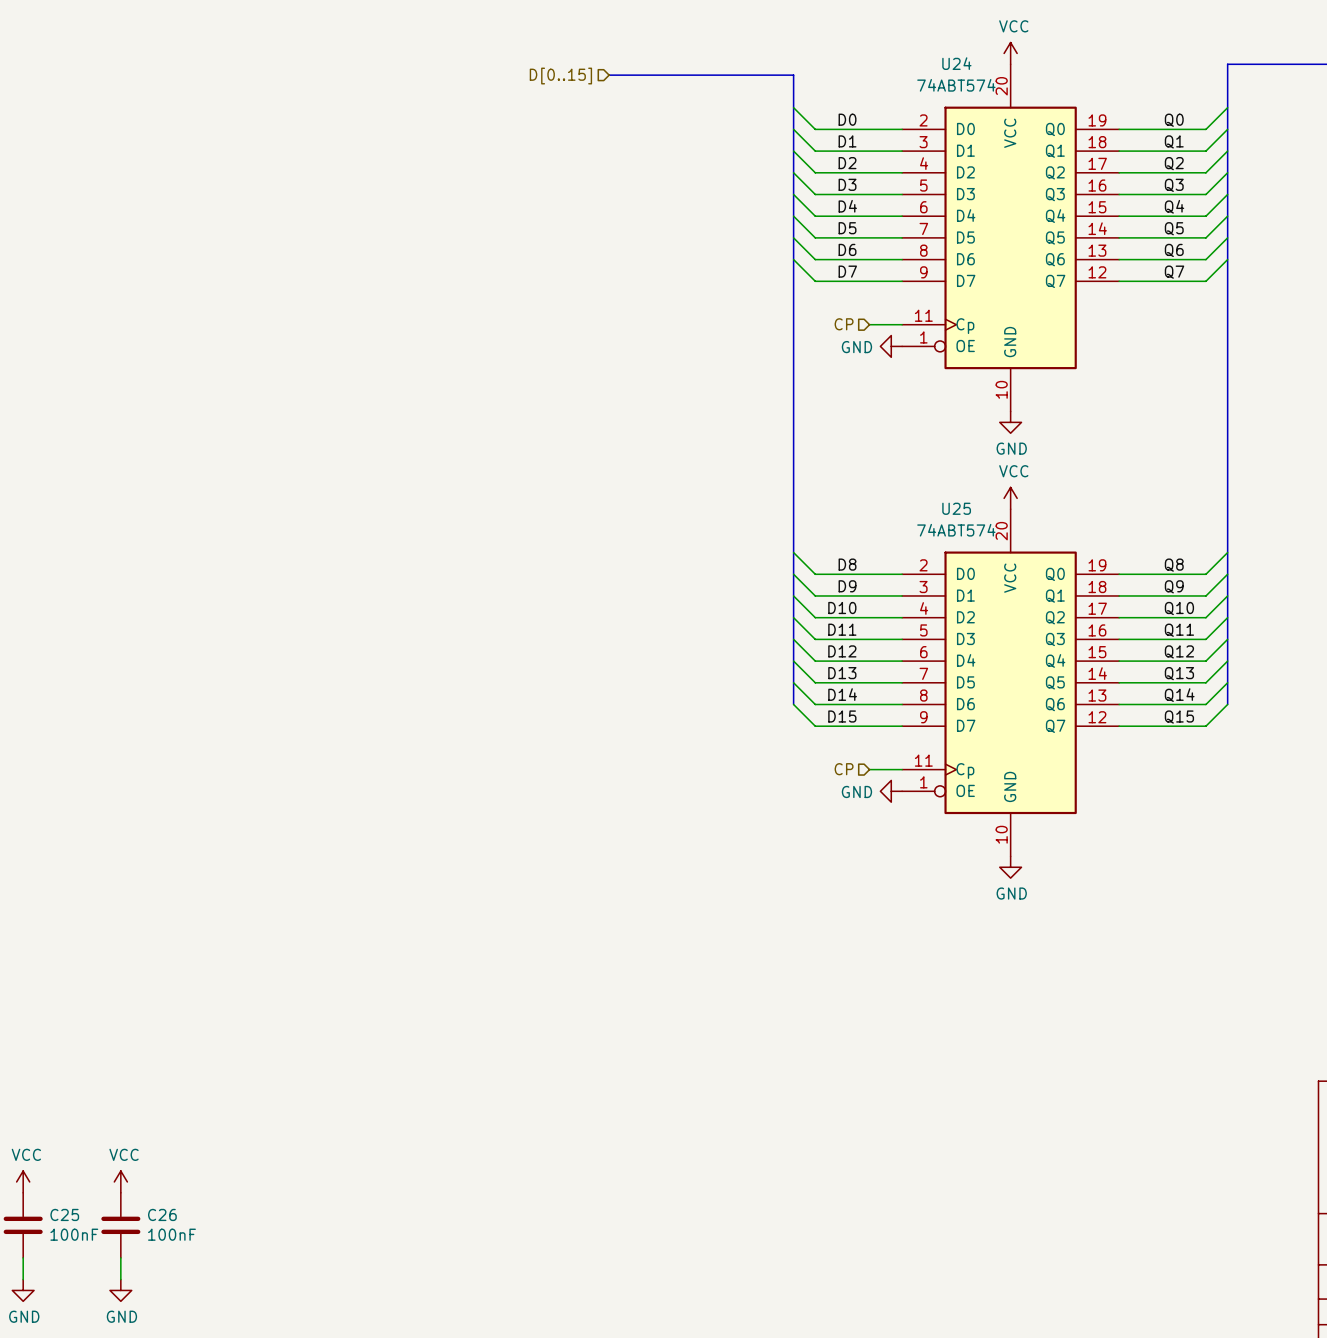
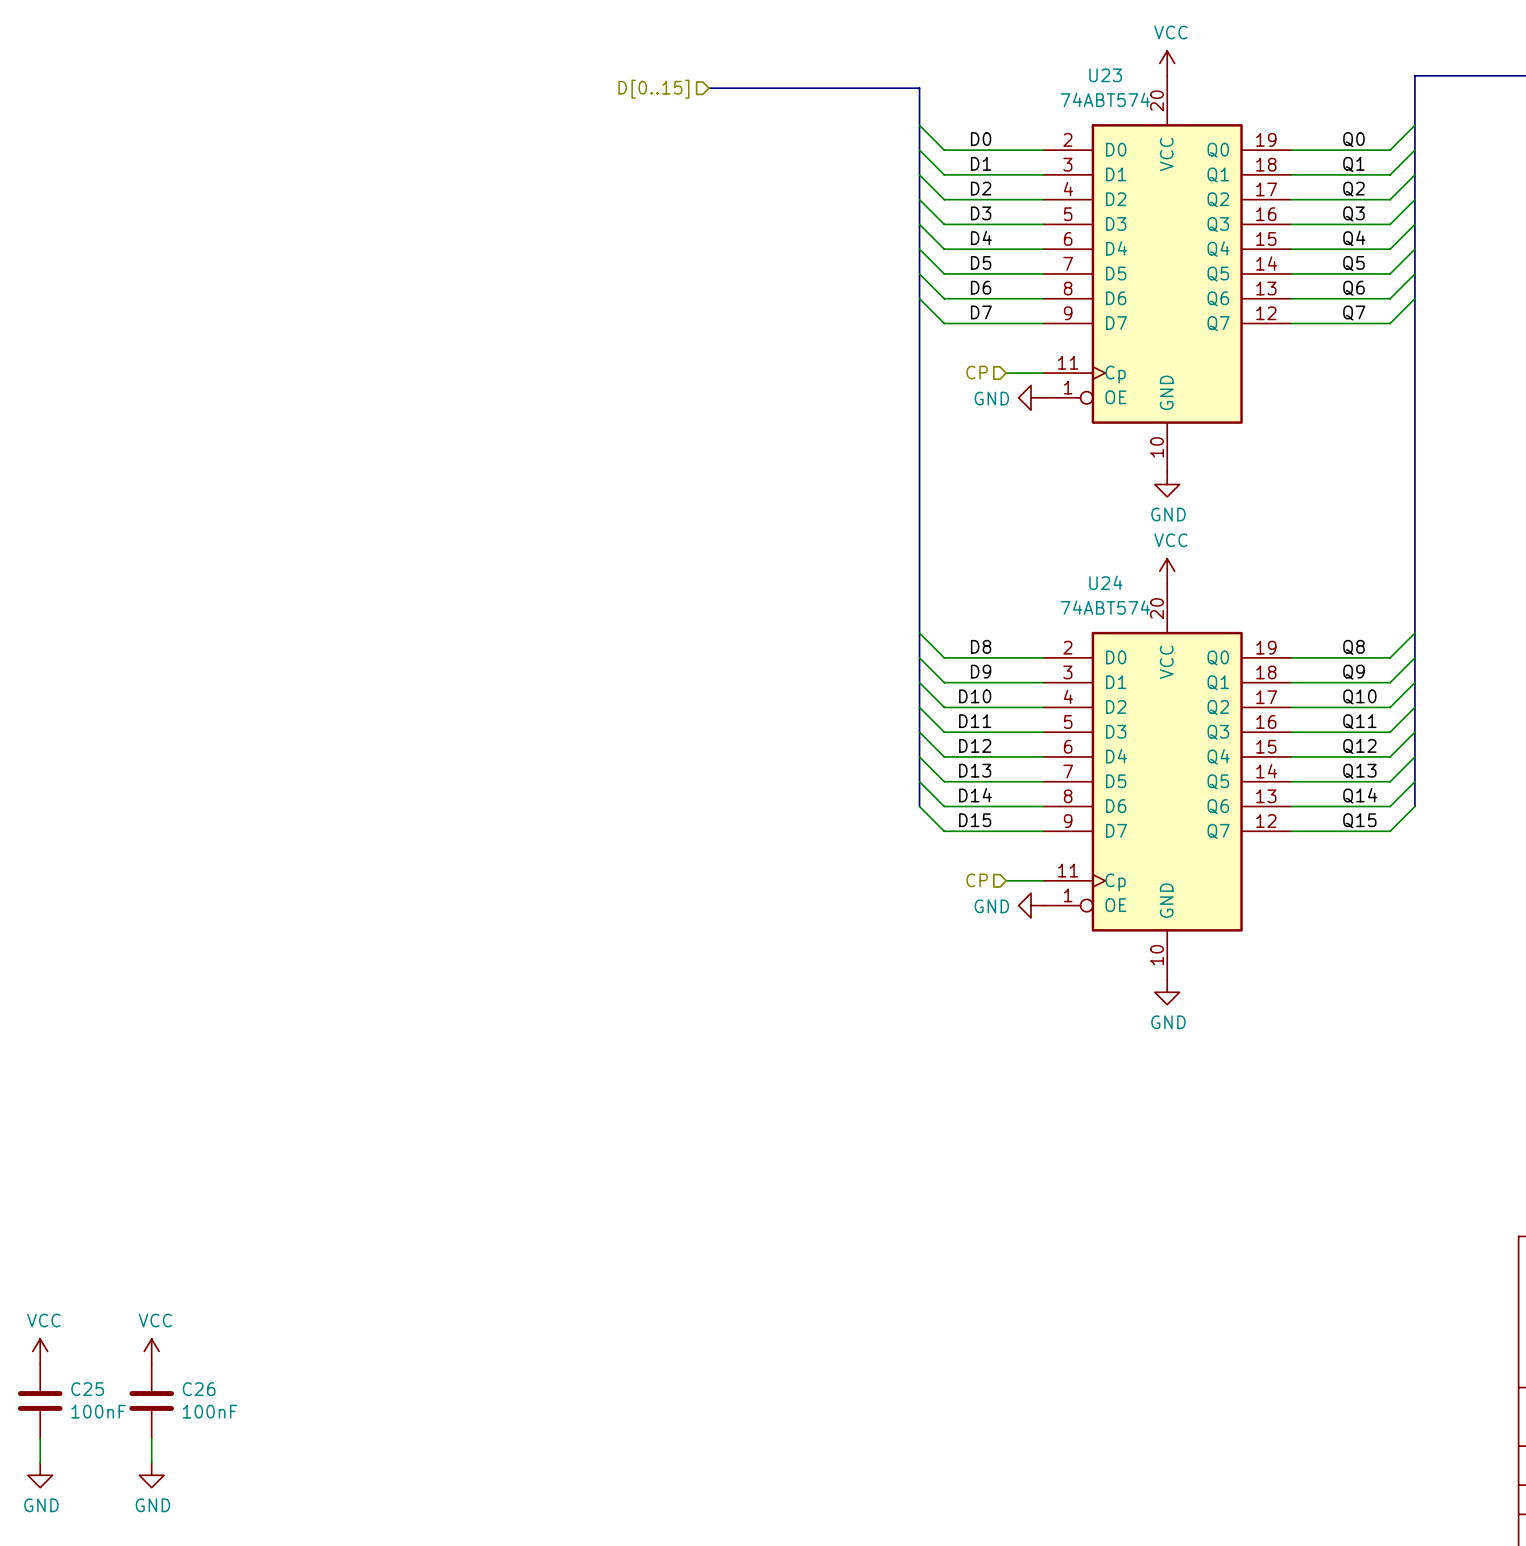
U24 name: U24 (956, 63) -> U23 (1105, 75)
U25 name: U25 (956, 508) -> U24 (1105, 582)

